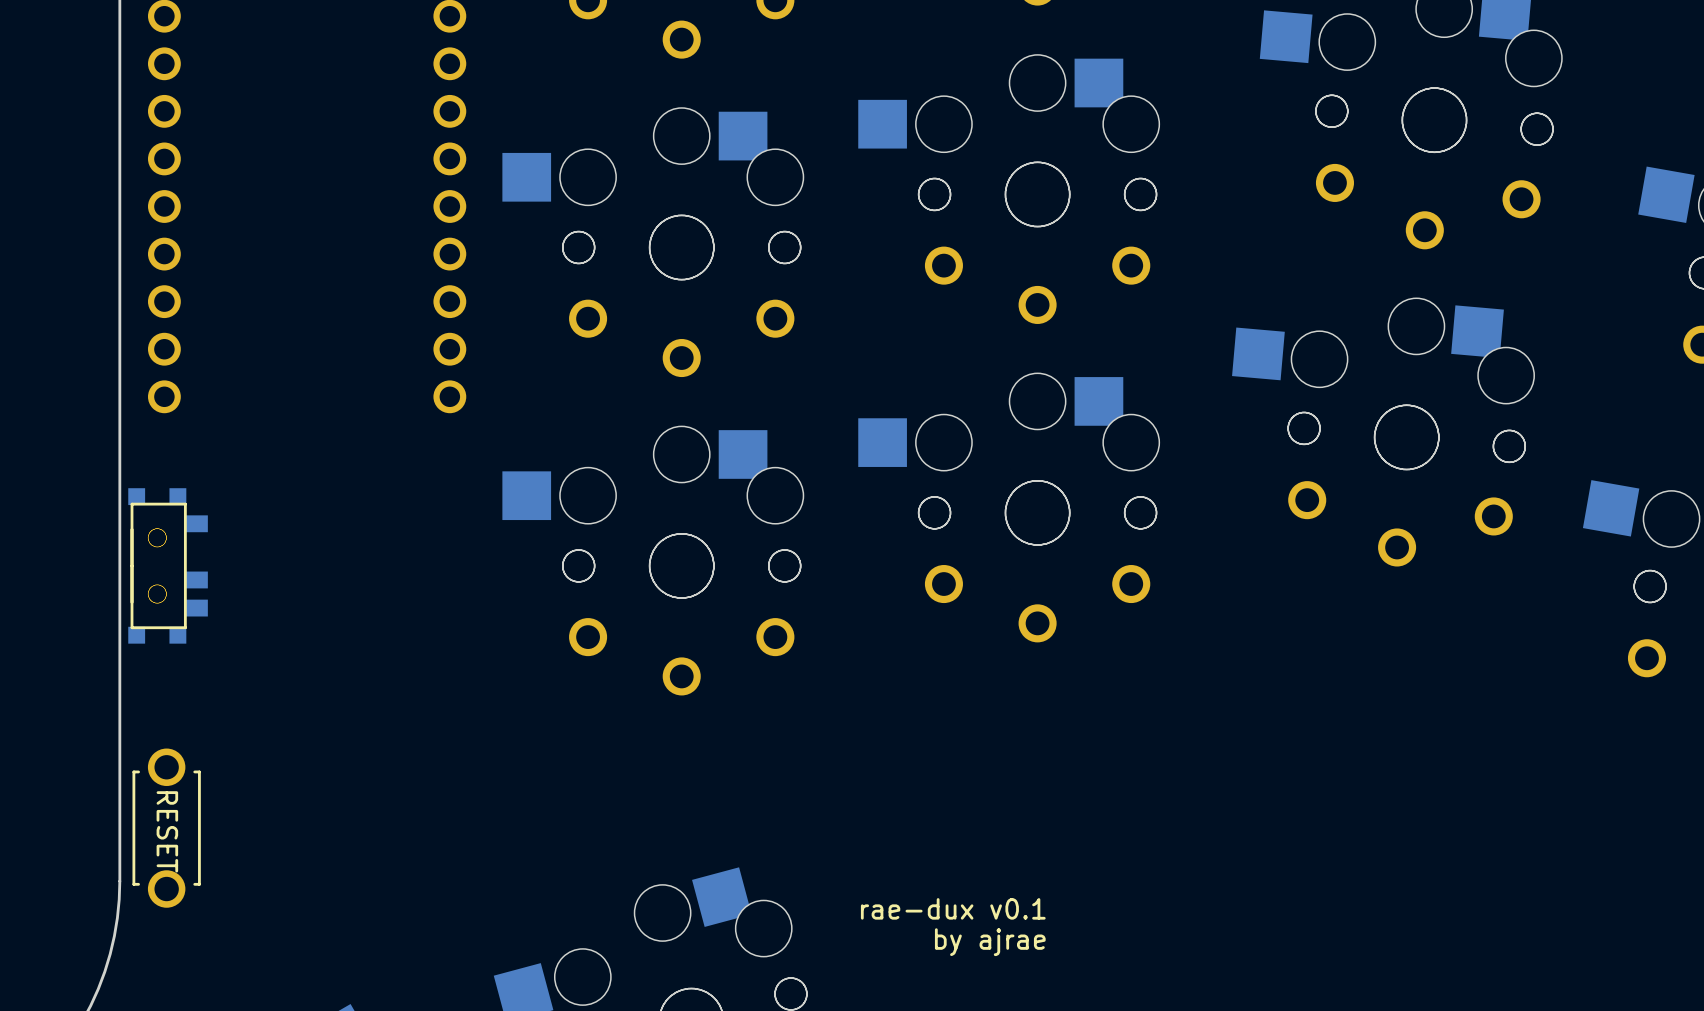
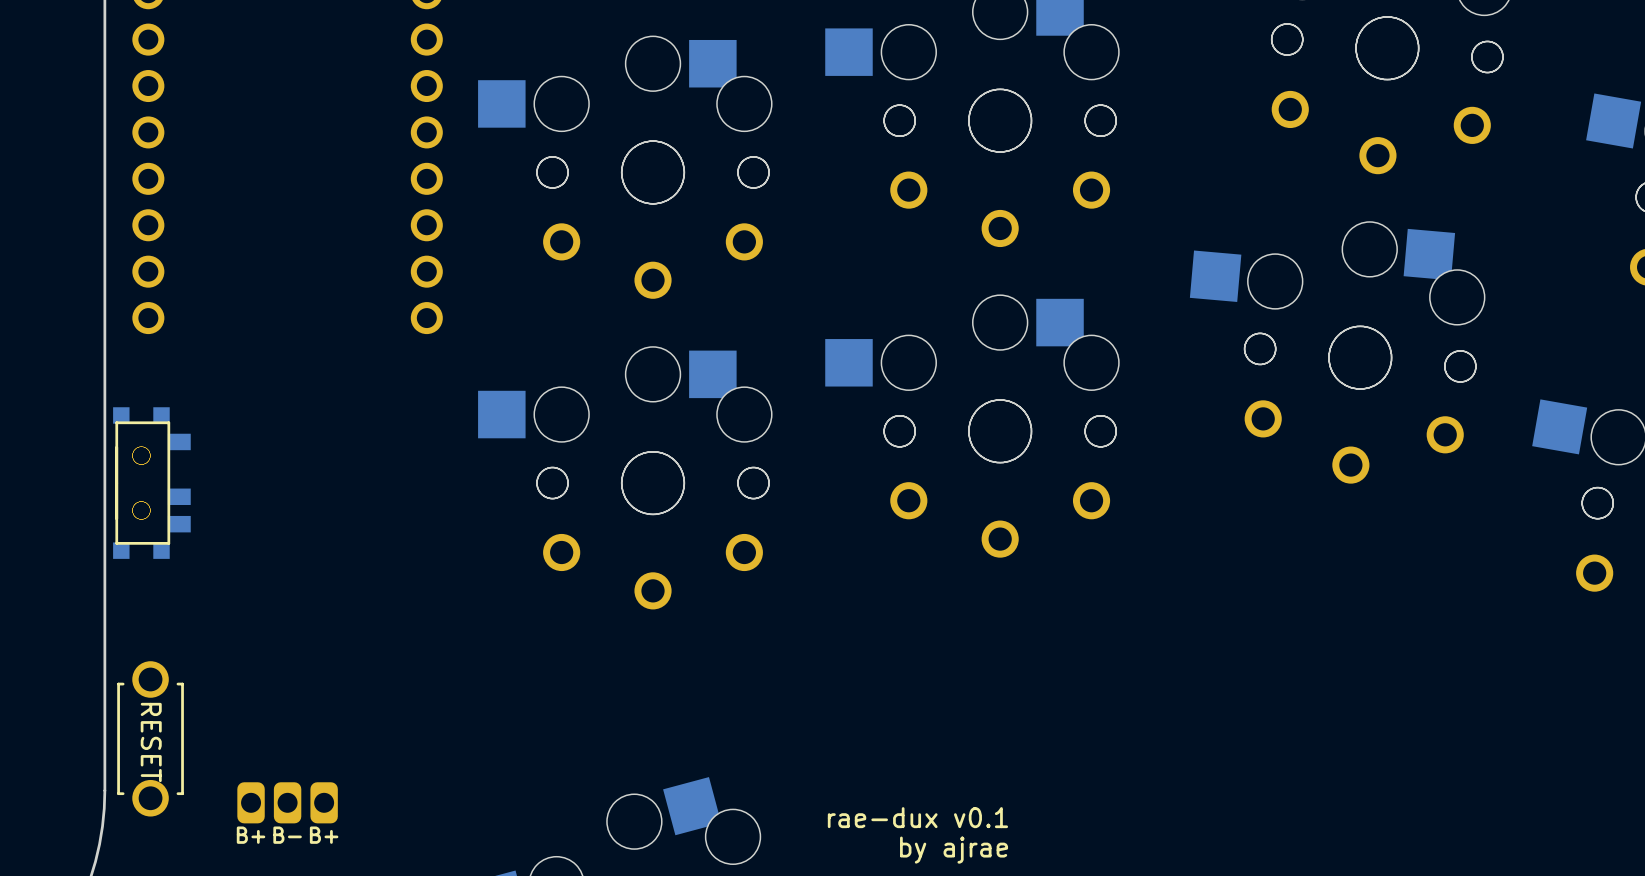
part: none -> (287, 802)

